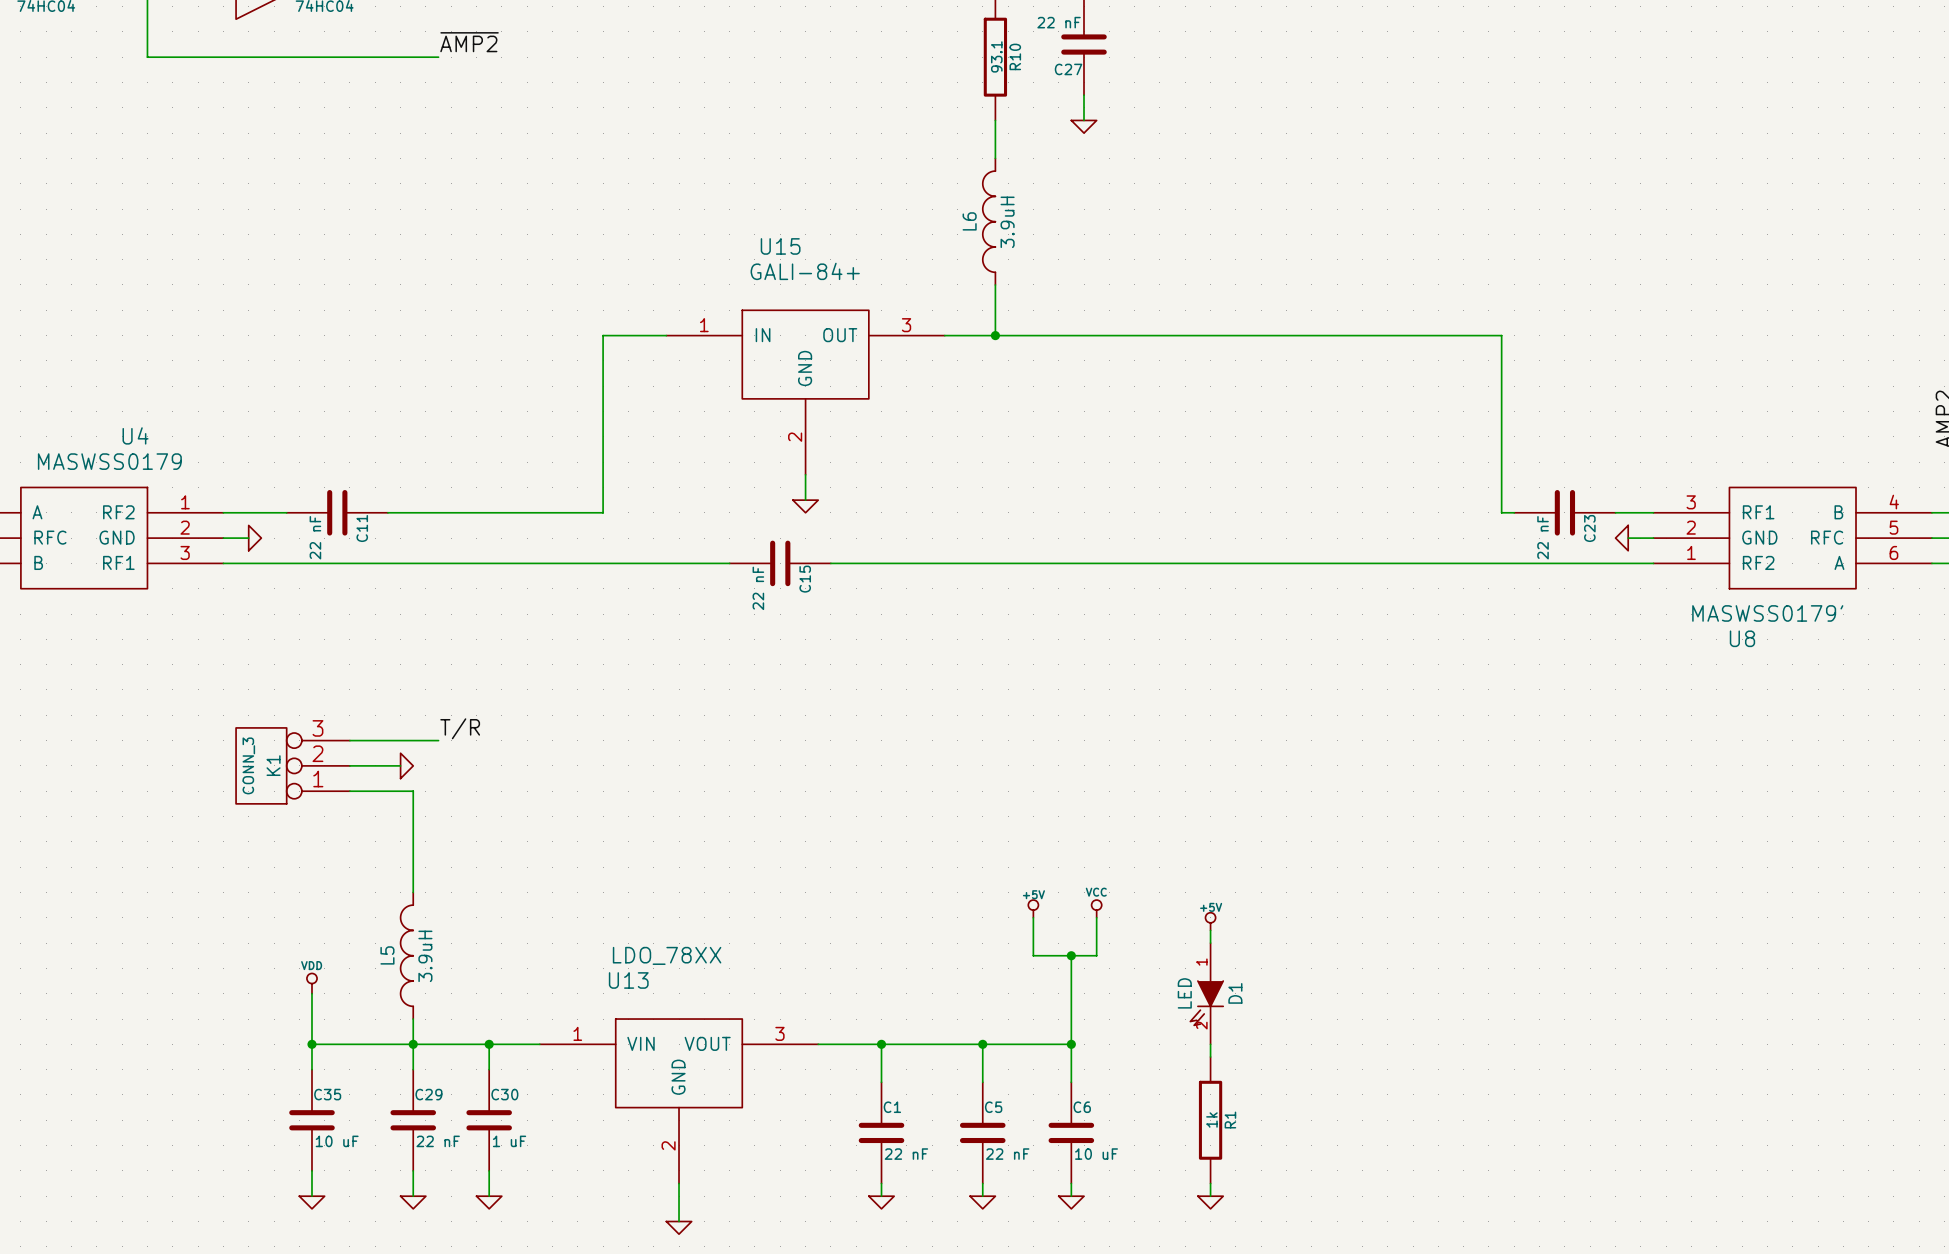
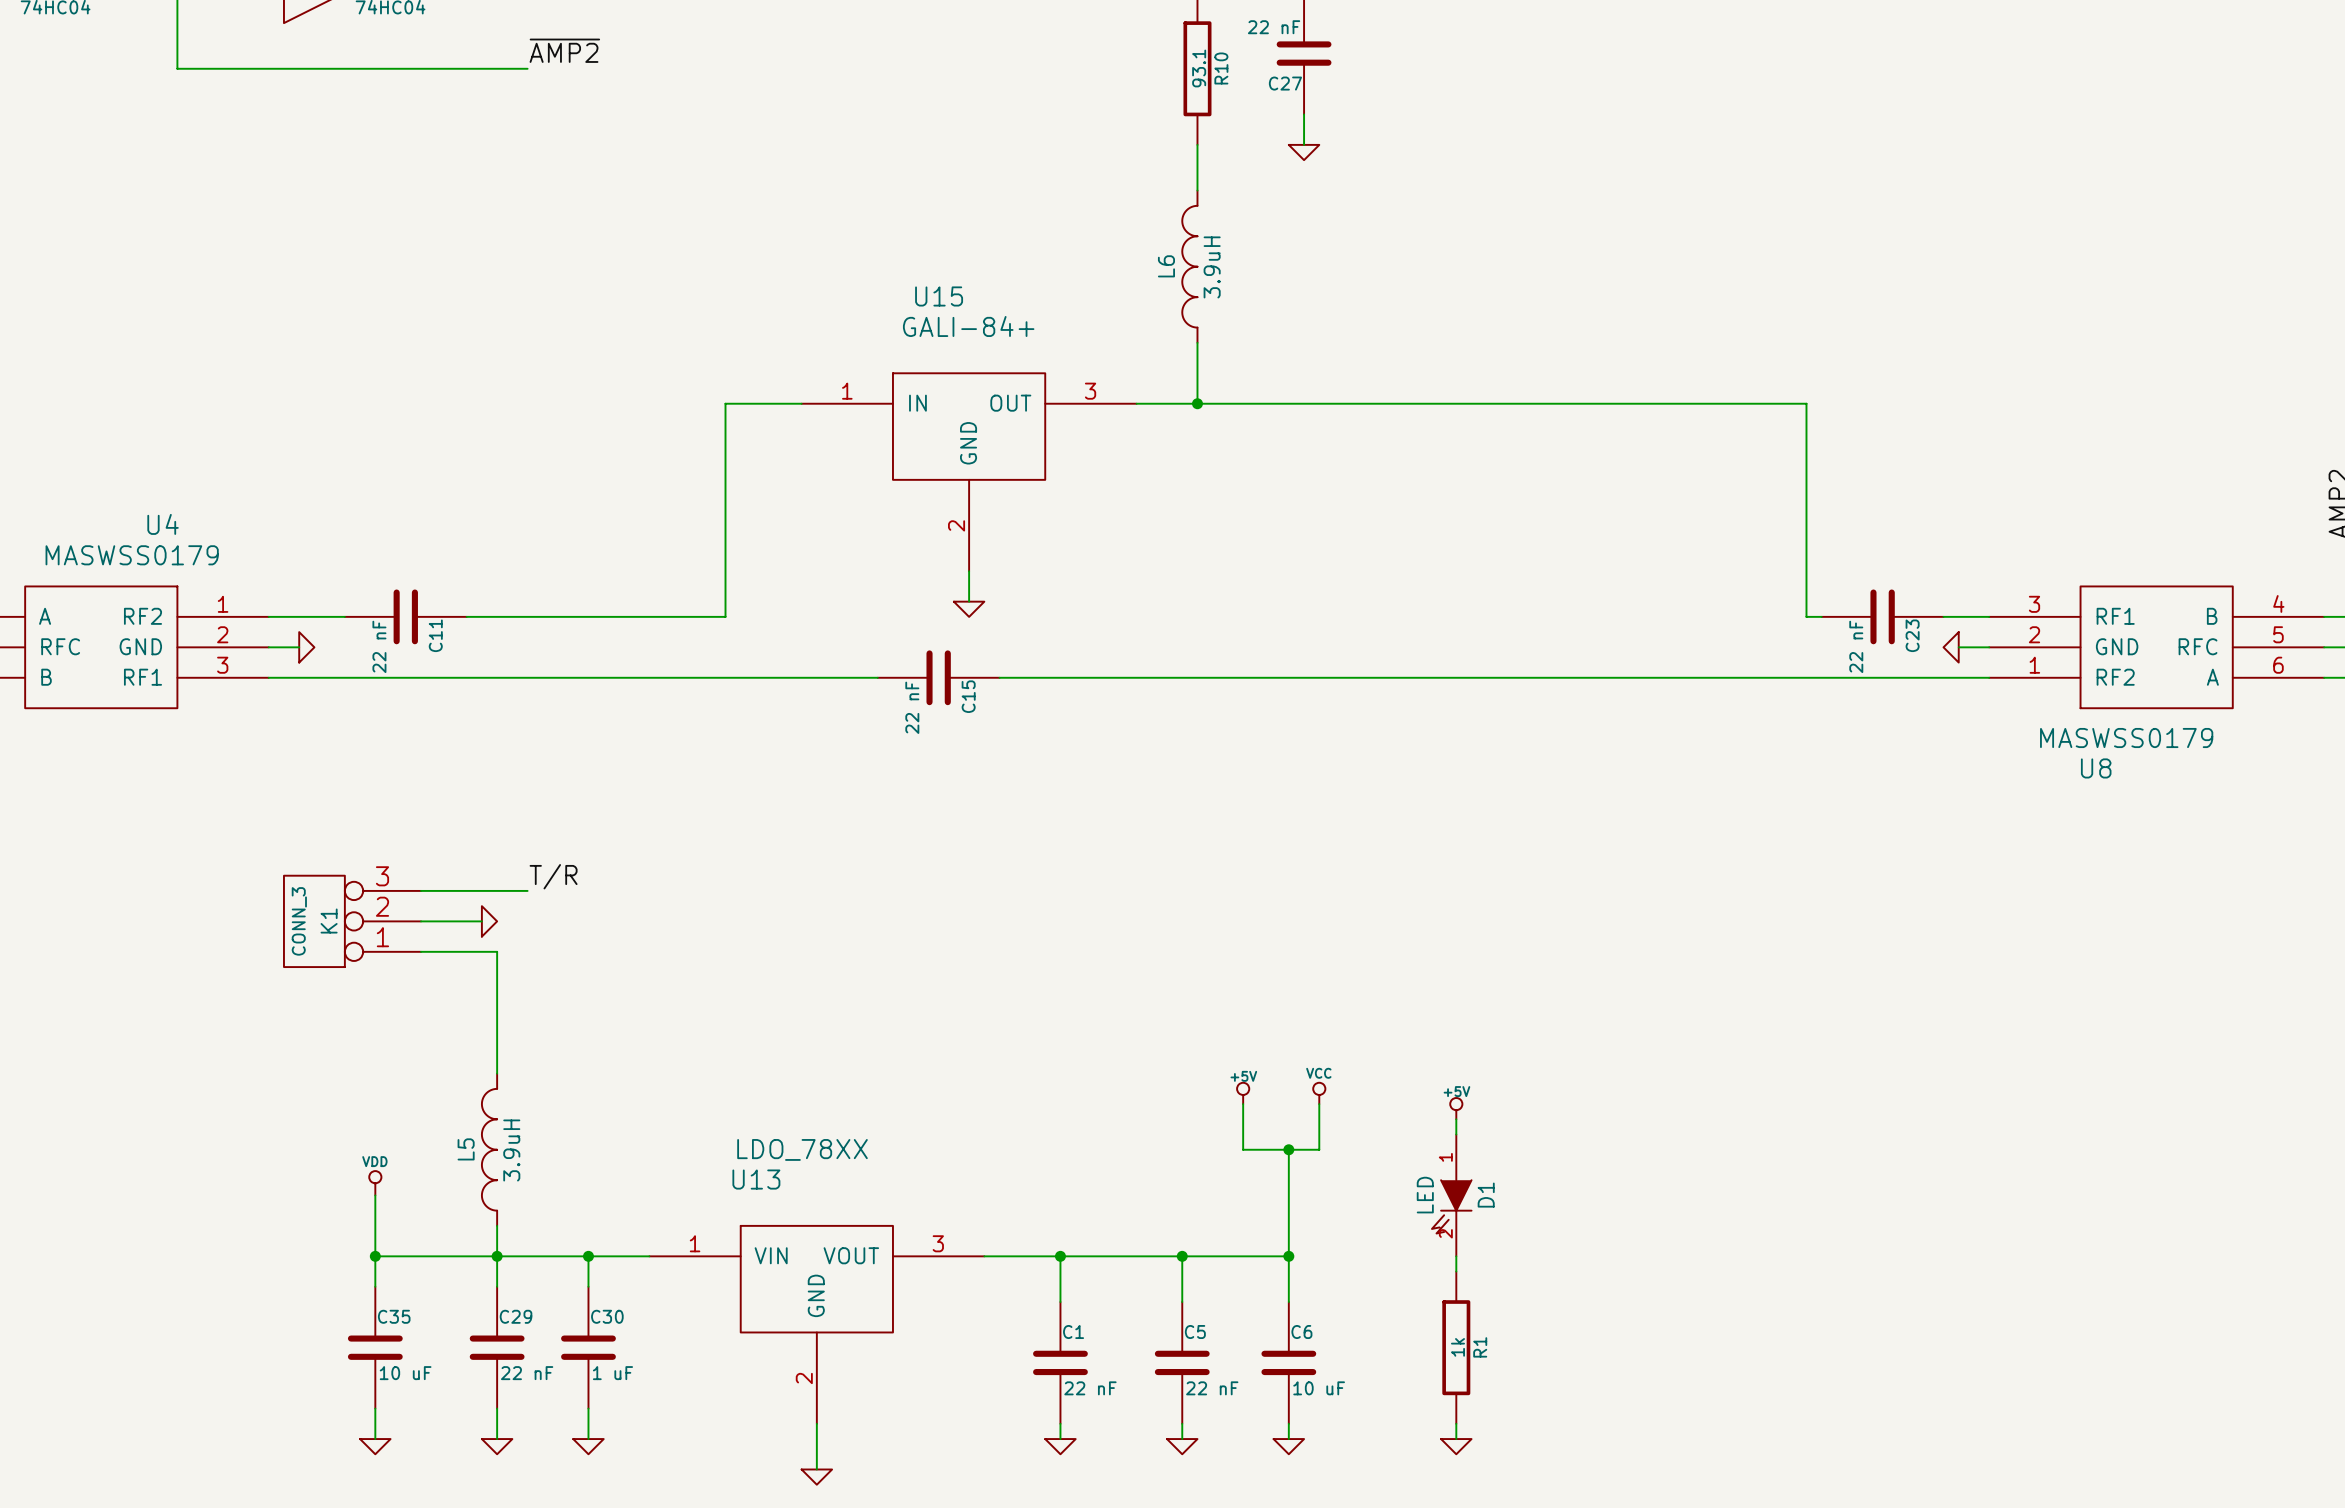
U8 value: MASWSS0179' (1767, 613) -> MASWSS0179 (2126, 738)

